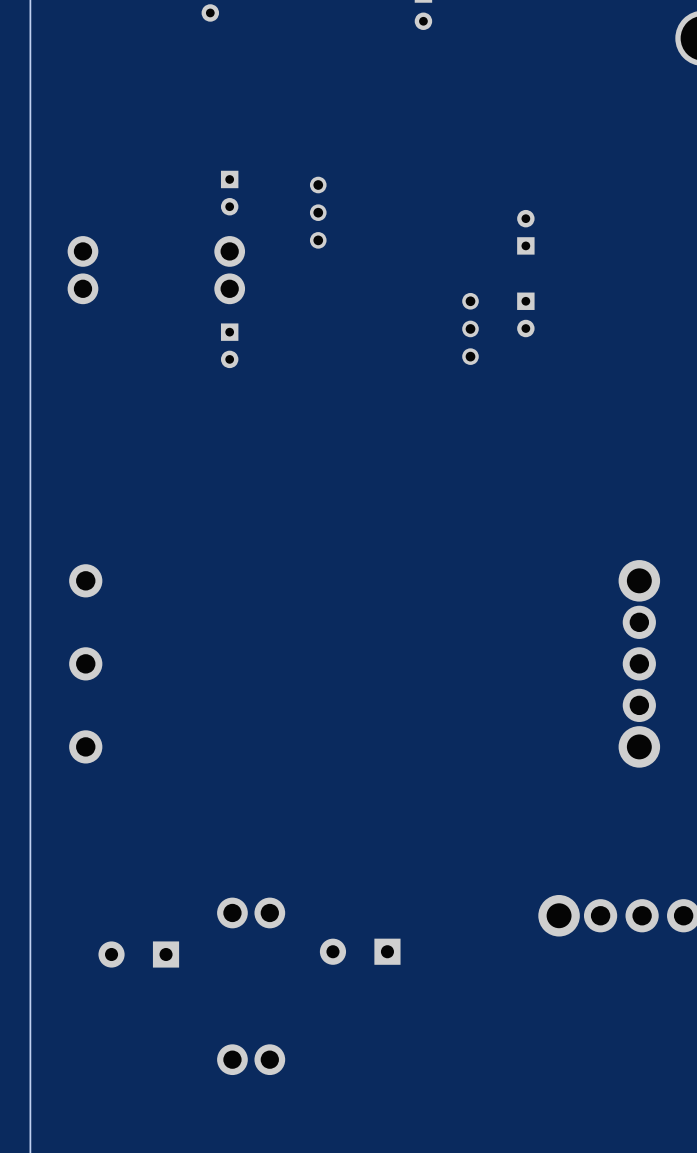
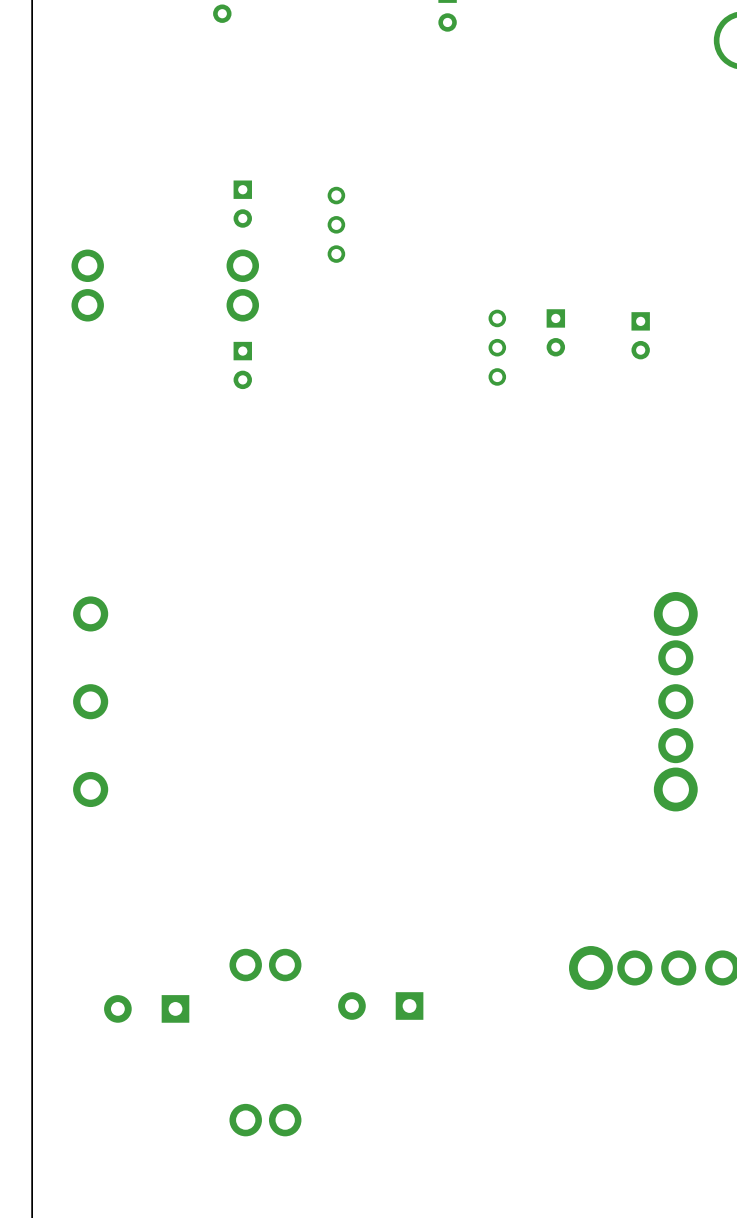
part rotation: 0° (525, 232) -> 180° (640, 335)
part position: (525, 232) -> (640, 335)

